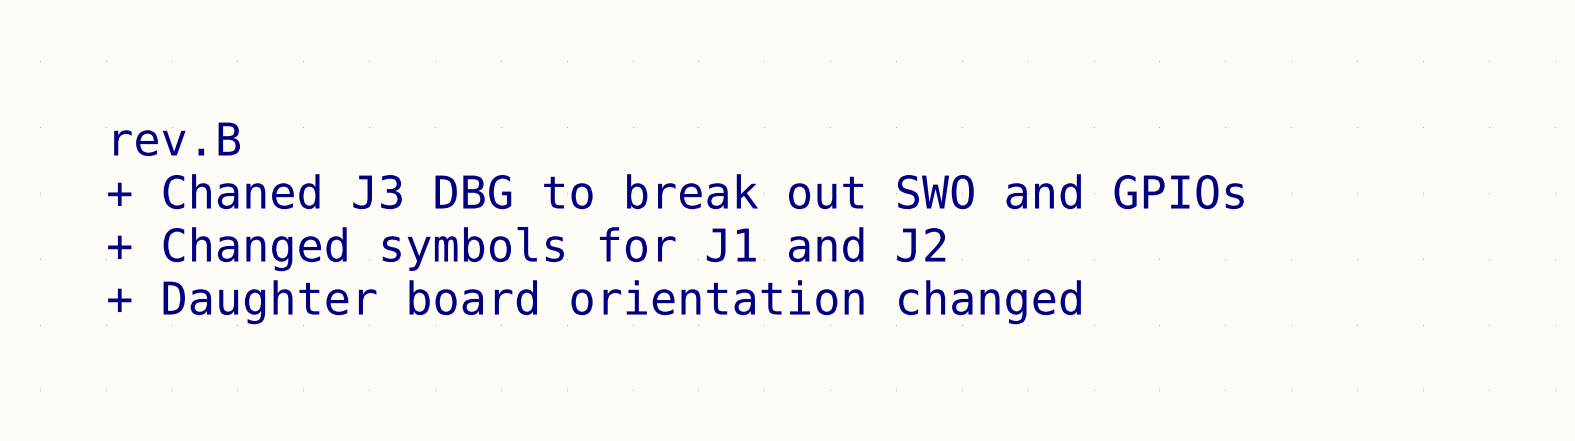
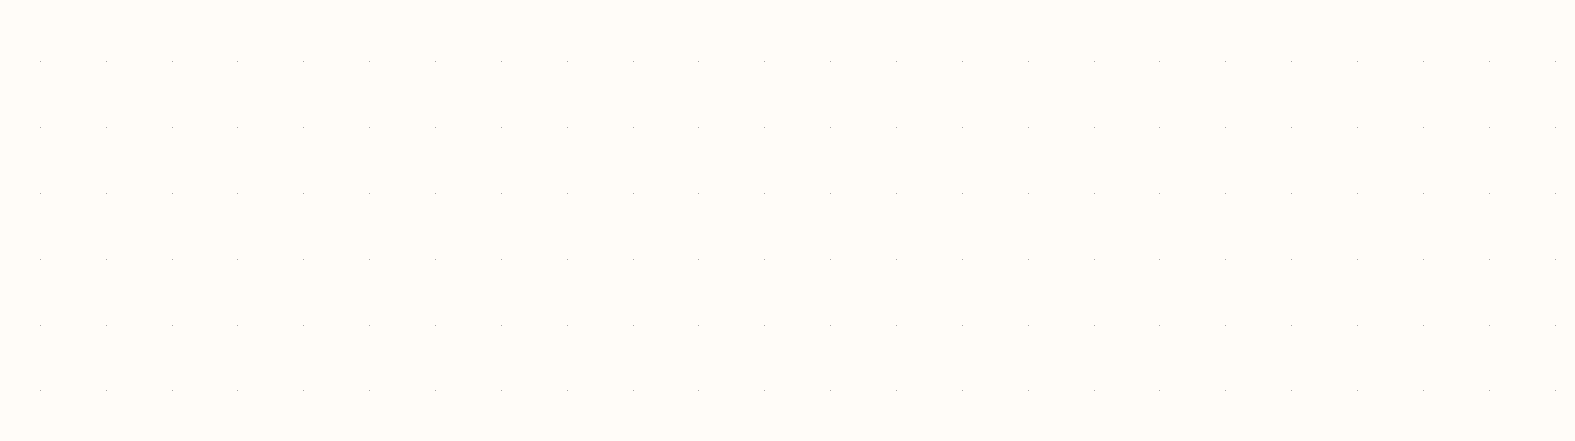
text: rev.B (177, 139) -> none
text: + Chaned J3 DBG to break out SWO and GPIOs (675, 191) -> none
text: + Changed symbols for J1 and J2 (526, 249) -> none
text: + Daughter board orientation changed (594, 302) -> none

